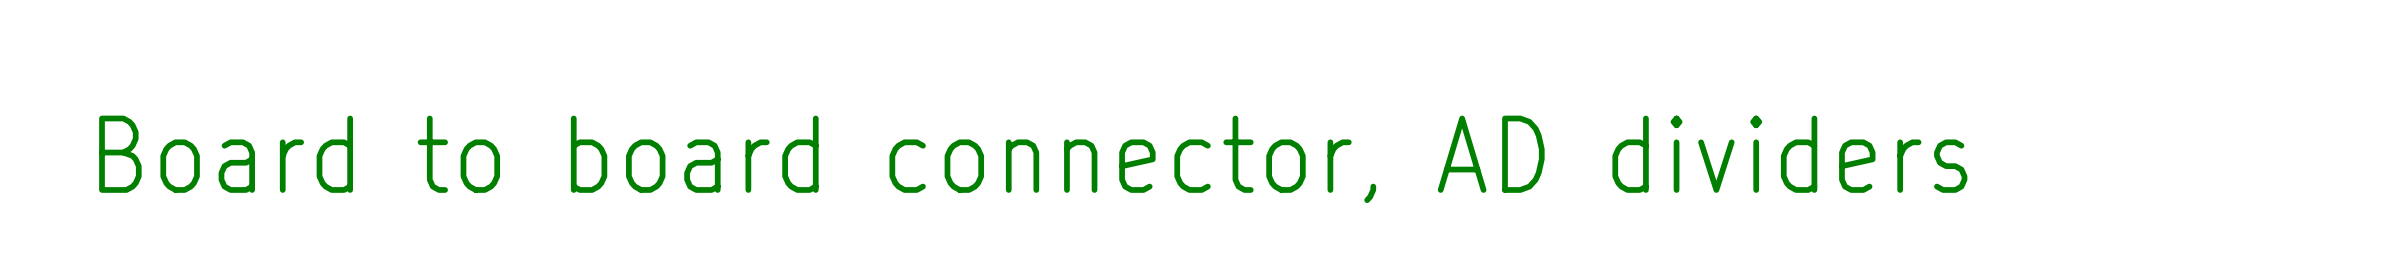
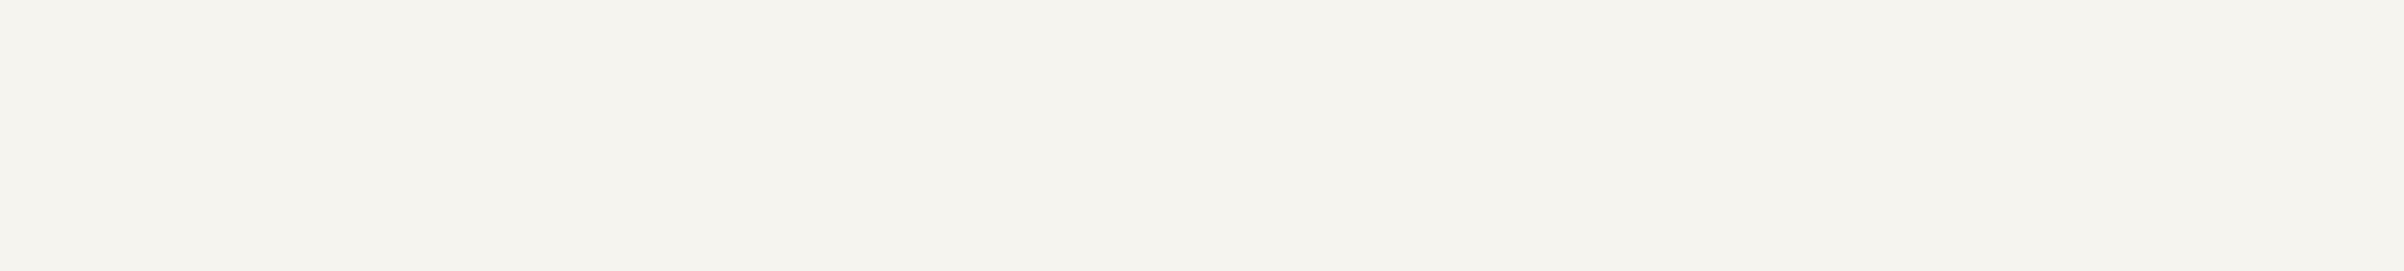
text: Board to board connector, AD dividers (1033, 159) -> none

